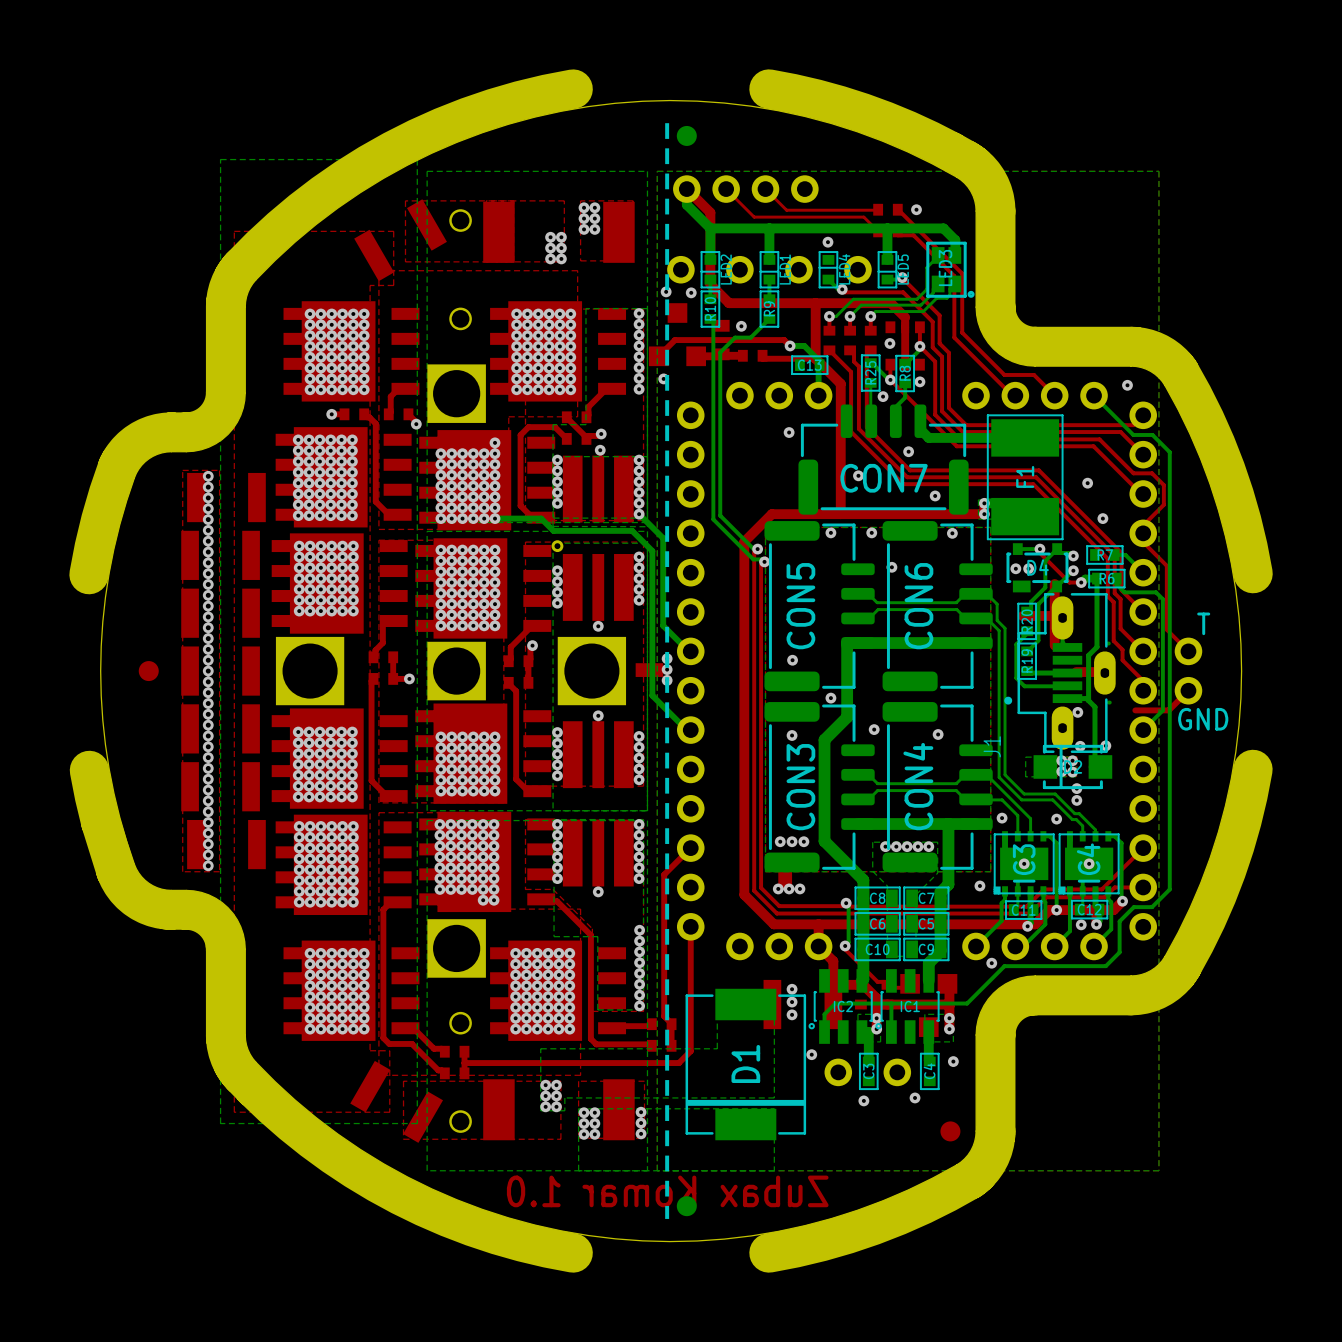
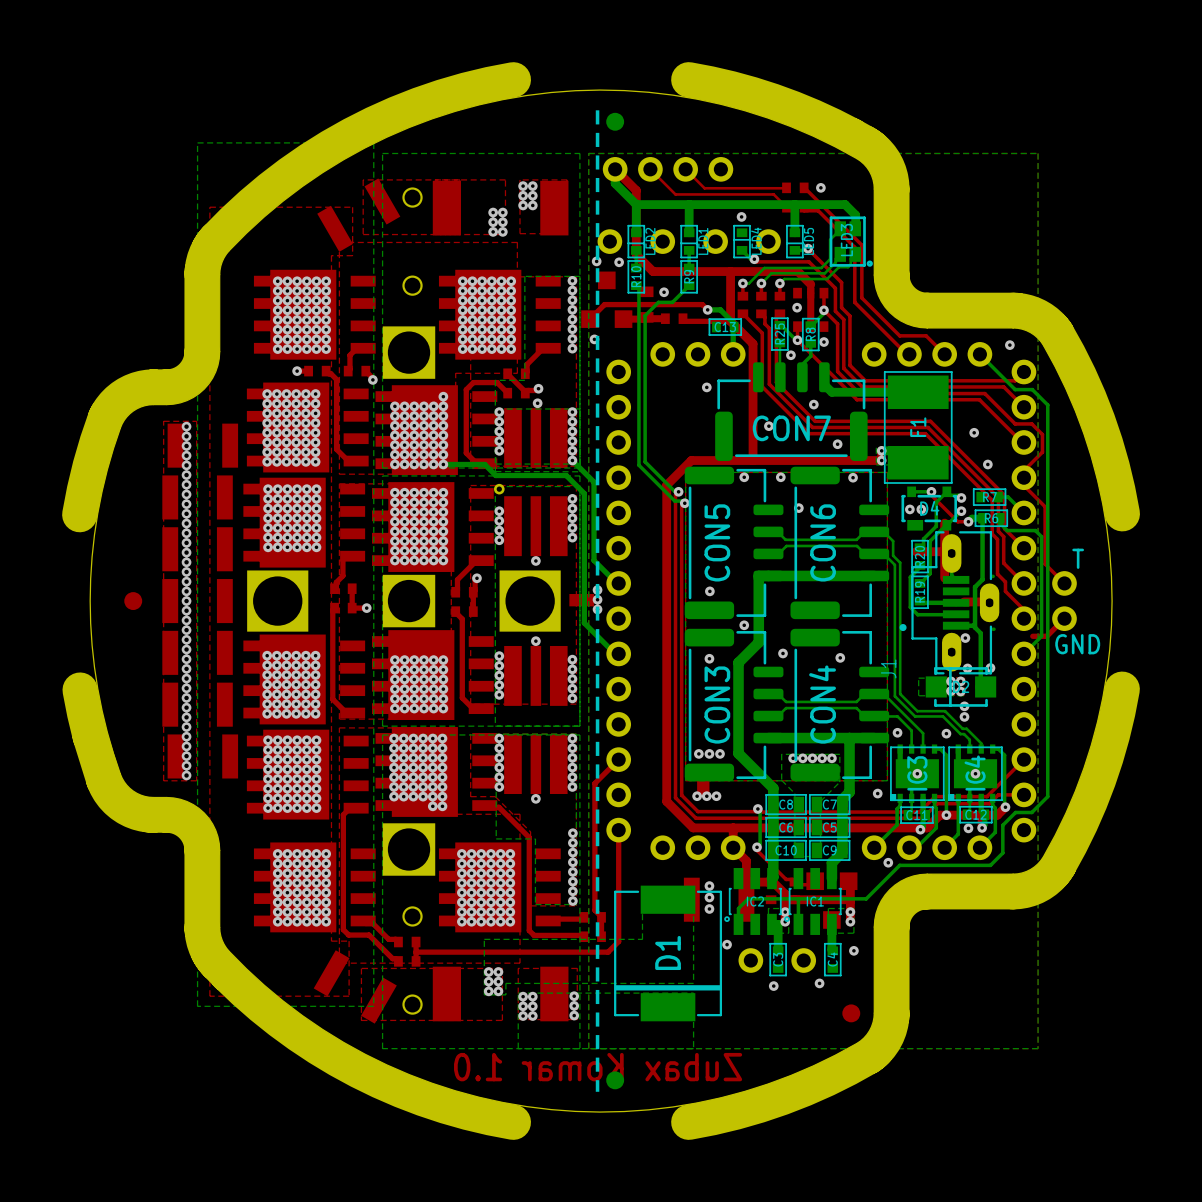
top track: (1153, 710) (1135, 710) -> none

